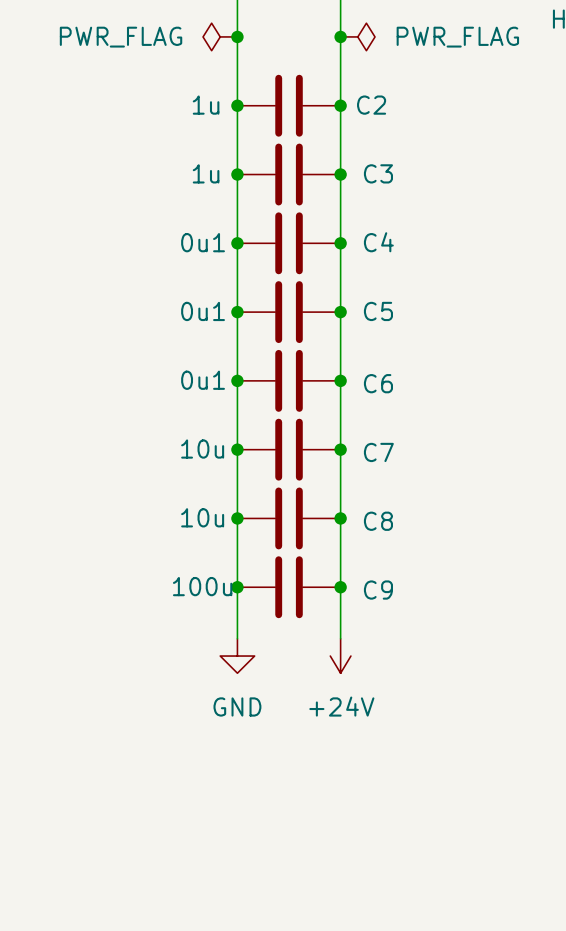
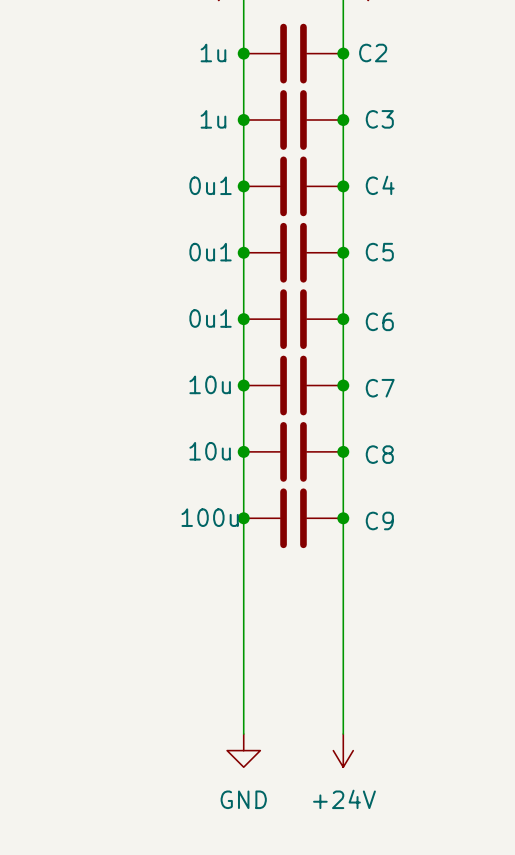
wire: none -> (243, 568) (243, 734)
wire: none -> (343, 568) (343, 734)
power symbol position: GND (237, 656) -> GND (243, 750)
power symbol position: +24V (340, 656) -> +24V (343, 750)

